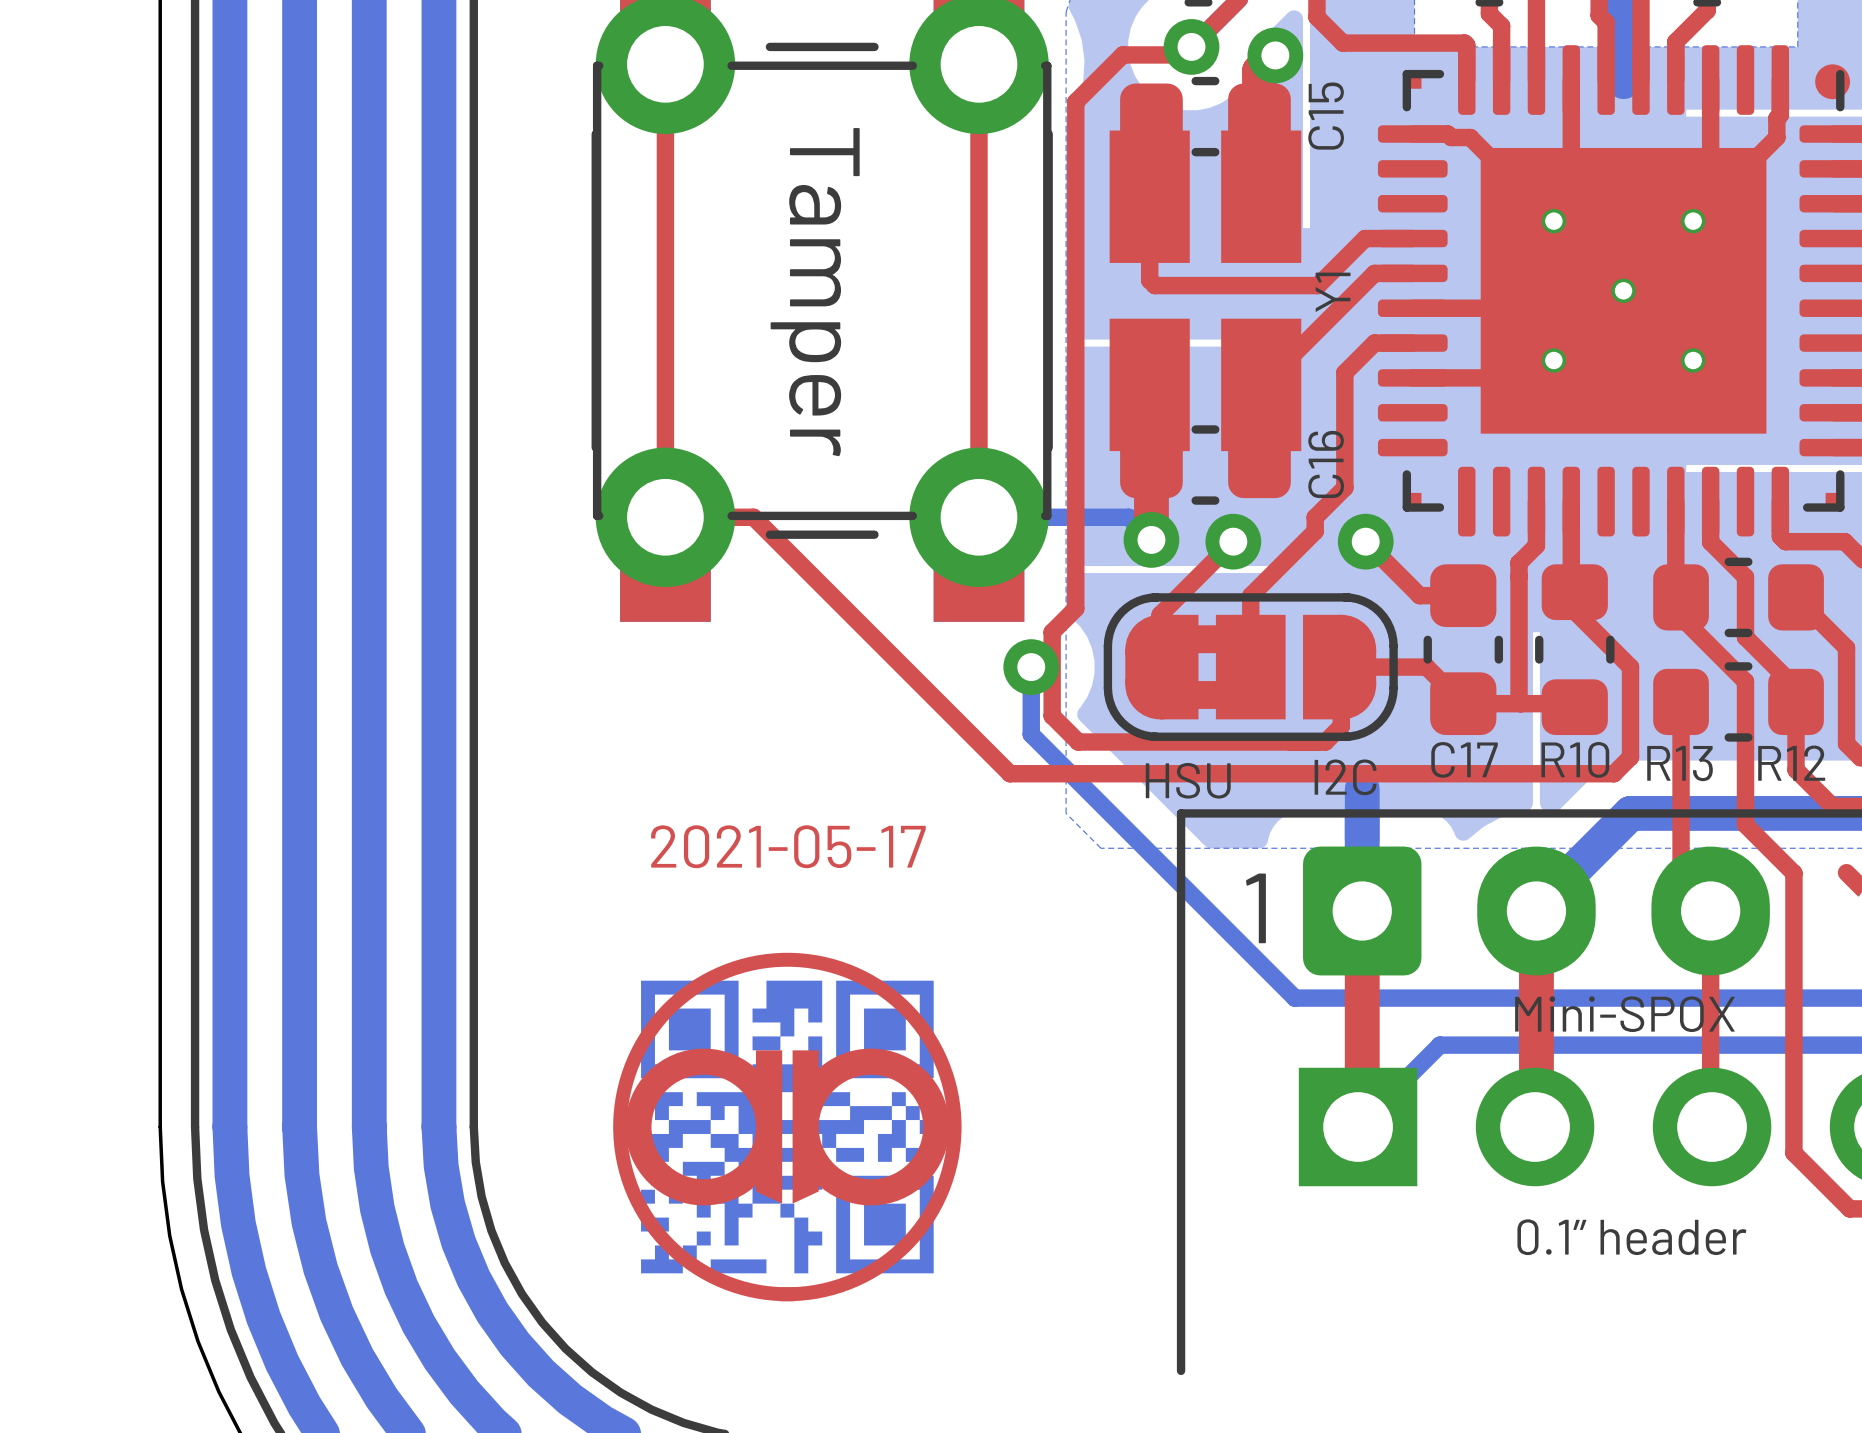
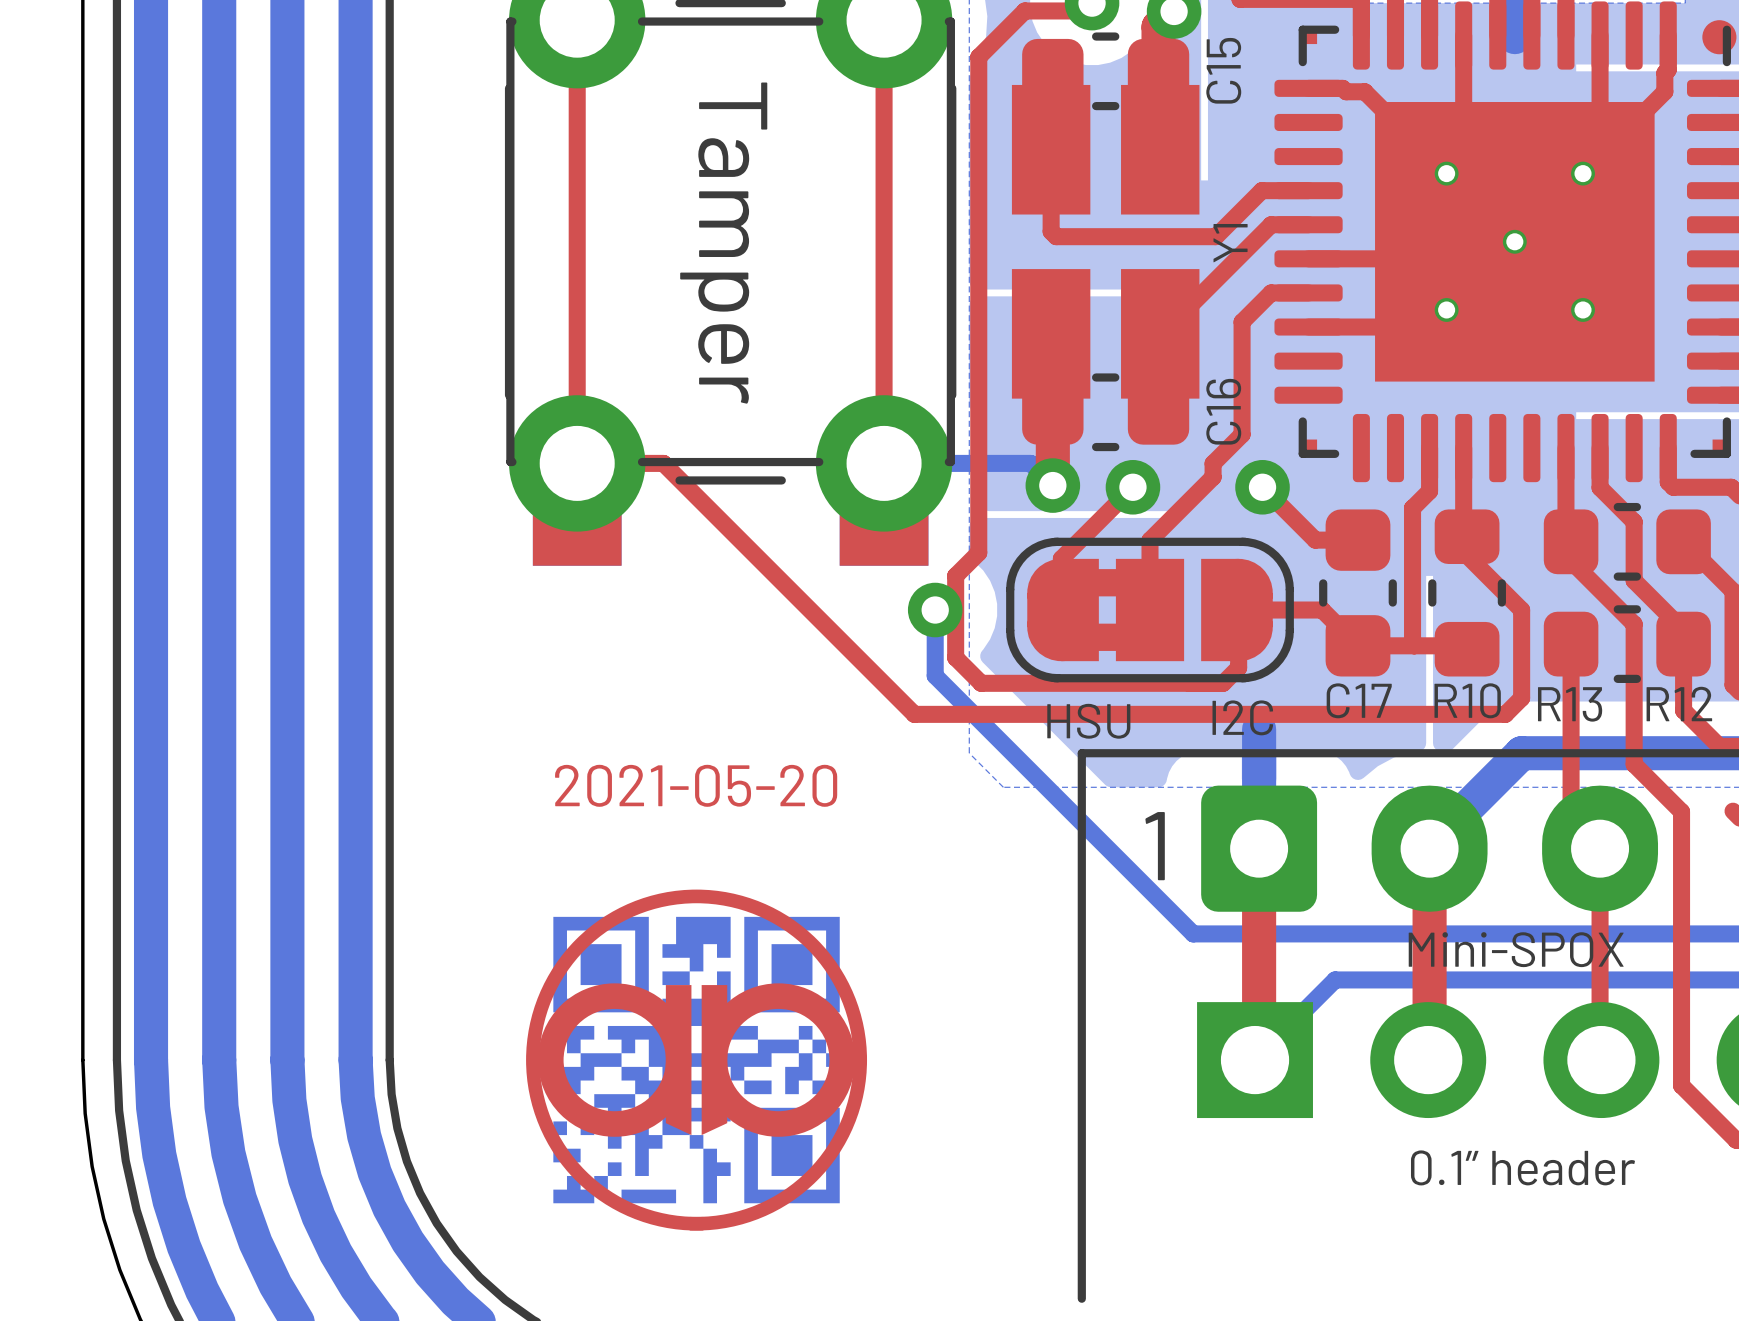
text: 2021-05-17 (788, 846) -> 2021-05-20 (696, 785)

